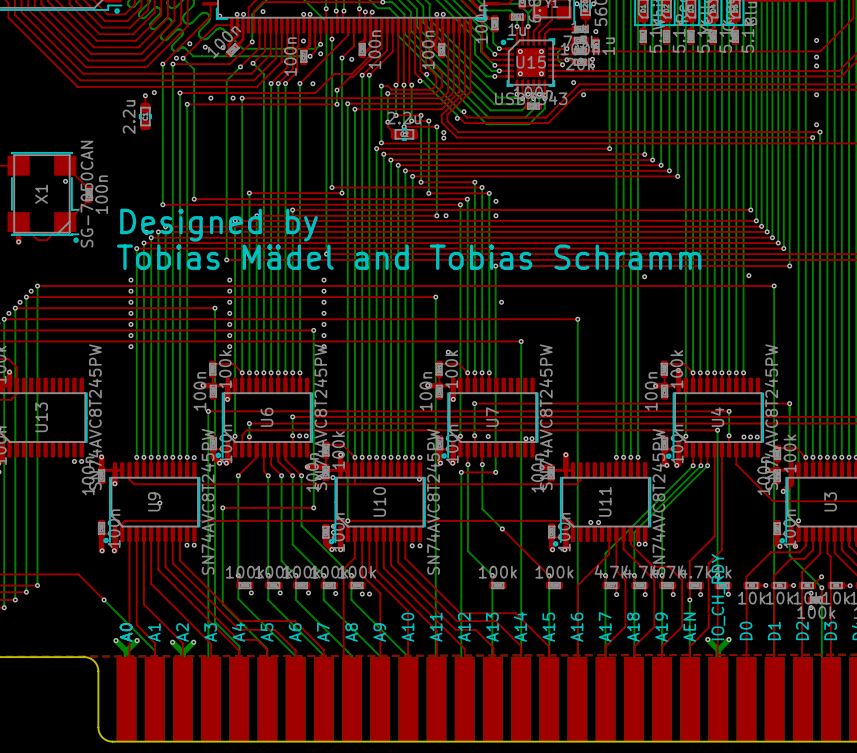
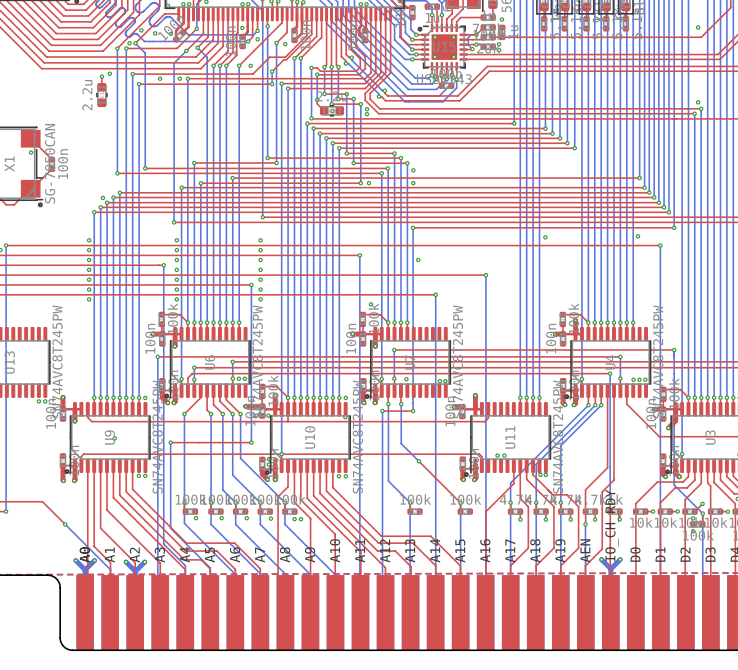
via: (816, 57) -> none
via: (816, 65) -> none
via: (573, 82) -> none
via: (583, 94) -> none
via: (816, 94) -> none
text: Designed by (219, 225) -> none
text: Tobias Mädel and Tobias Schramm (409, 257) -> none

